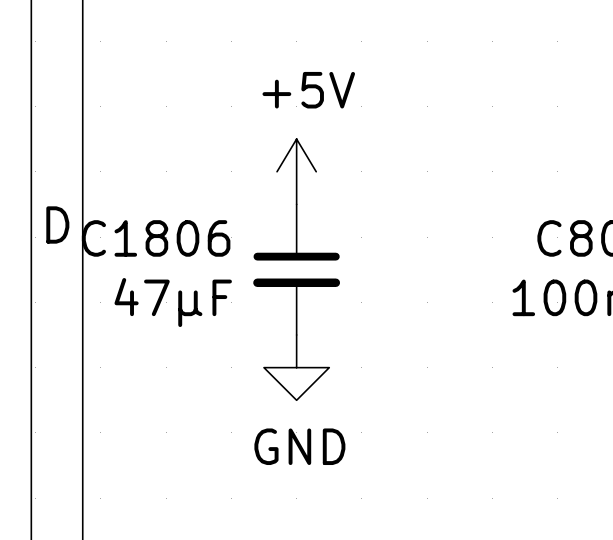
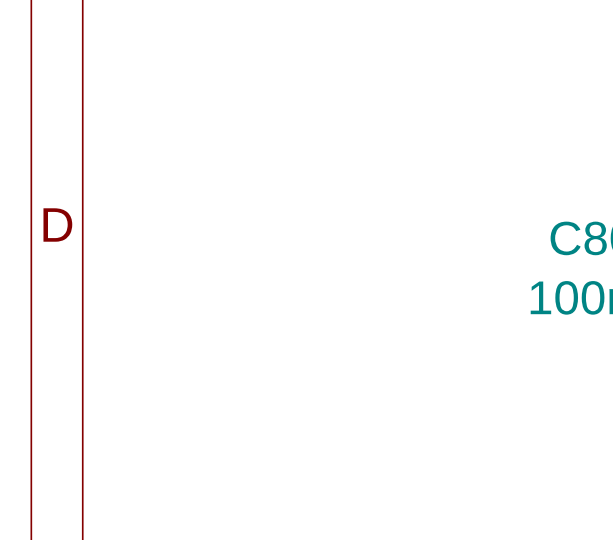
power symbol: +5V (296, 171) -> none
C1806: 47µF (296, 269) -> none
power symbol: GND (296, 367) -> none

